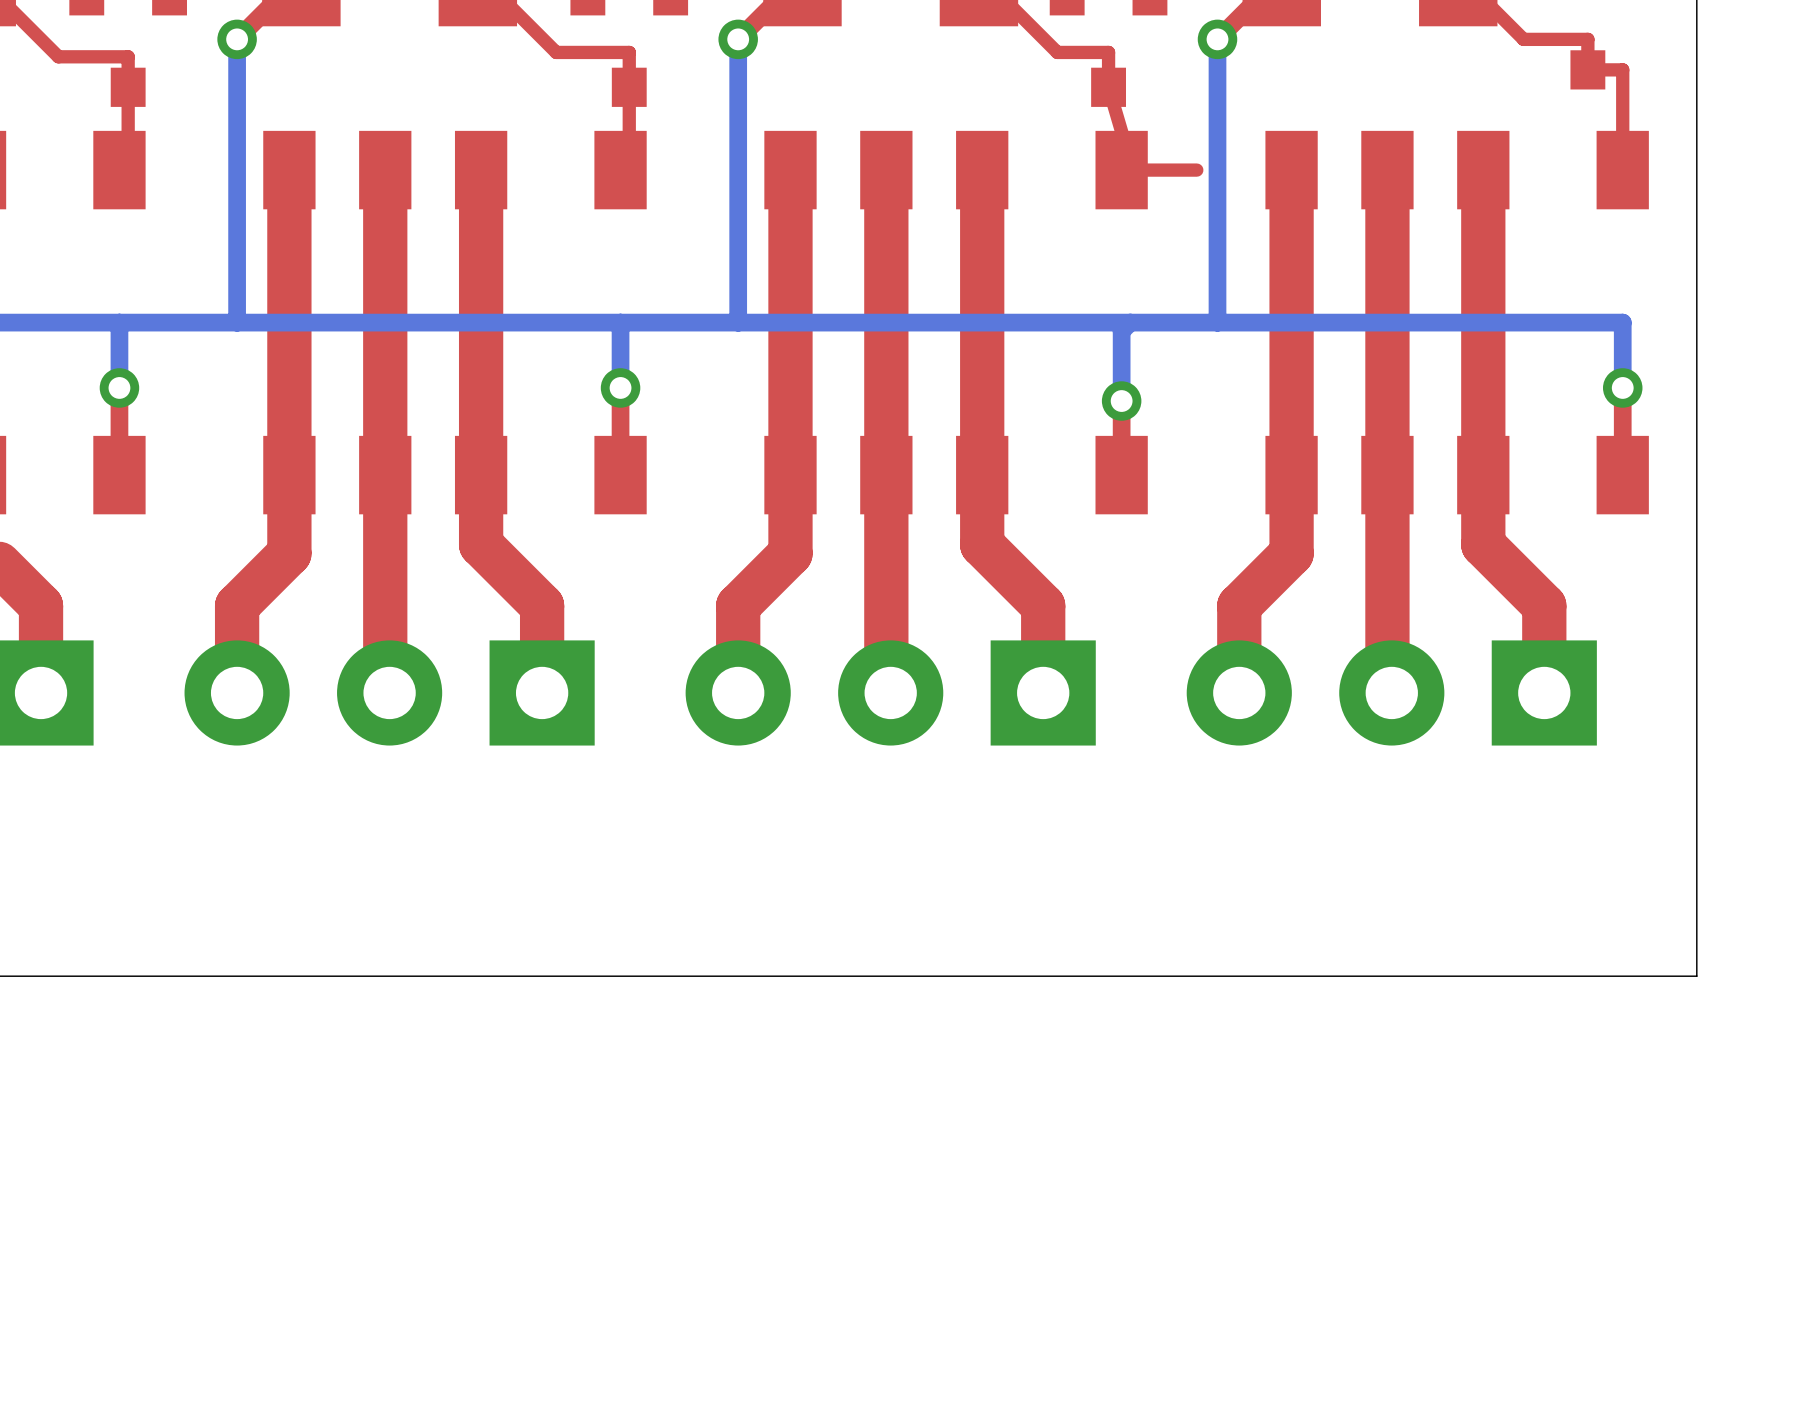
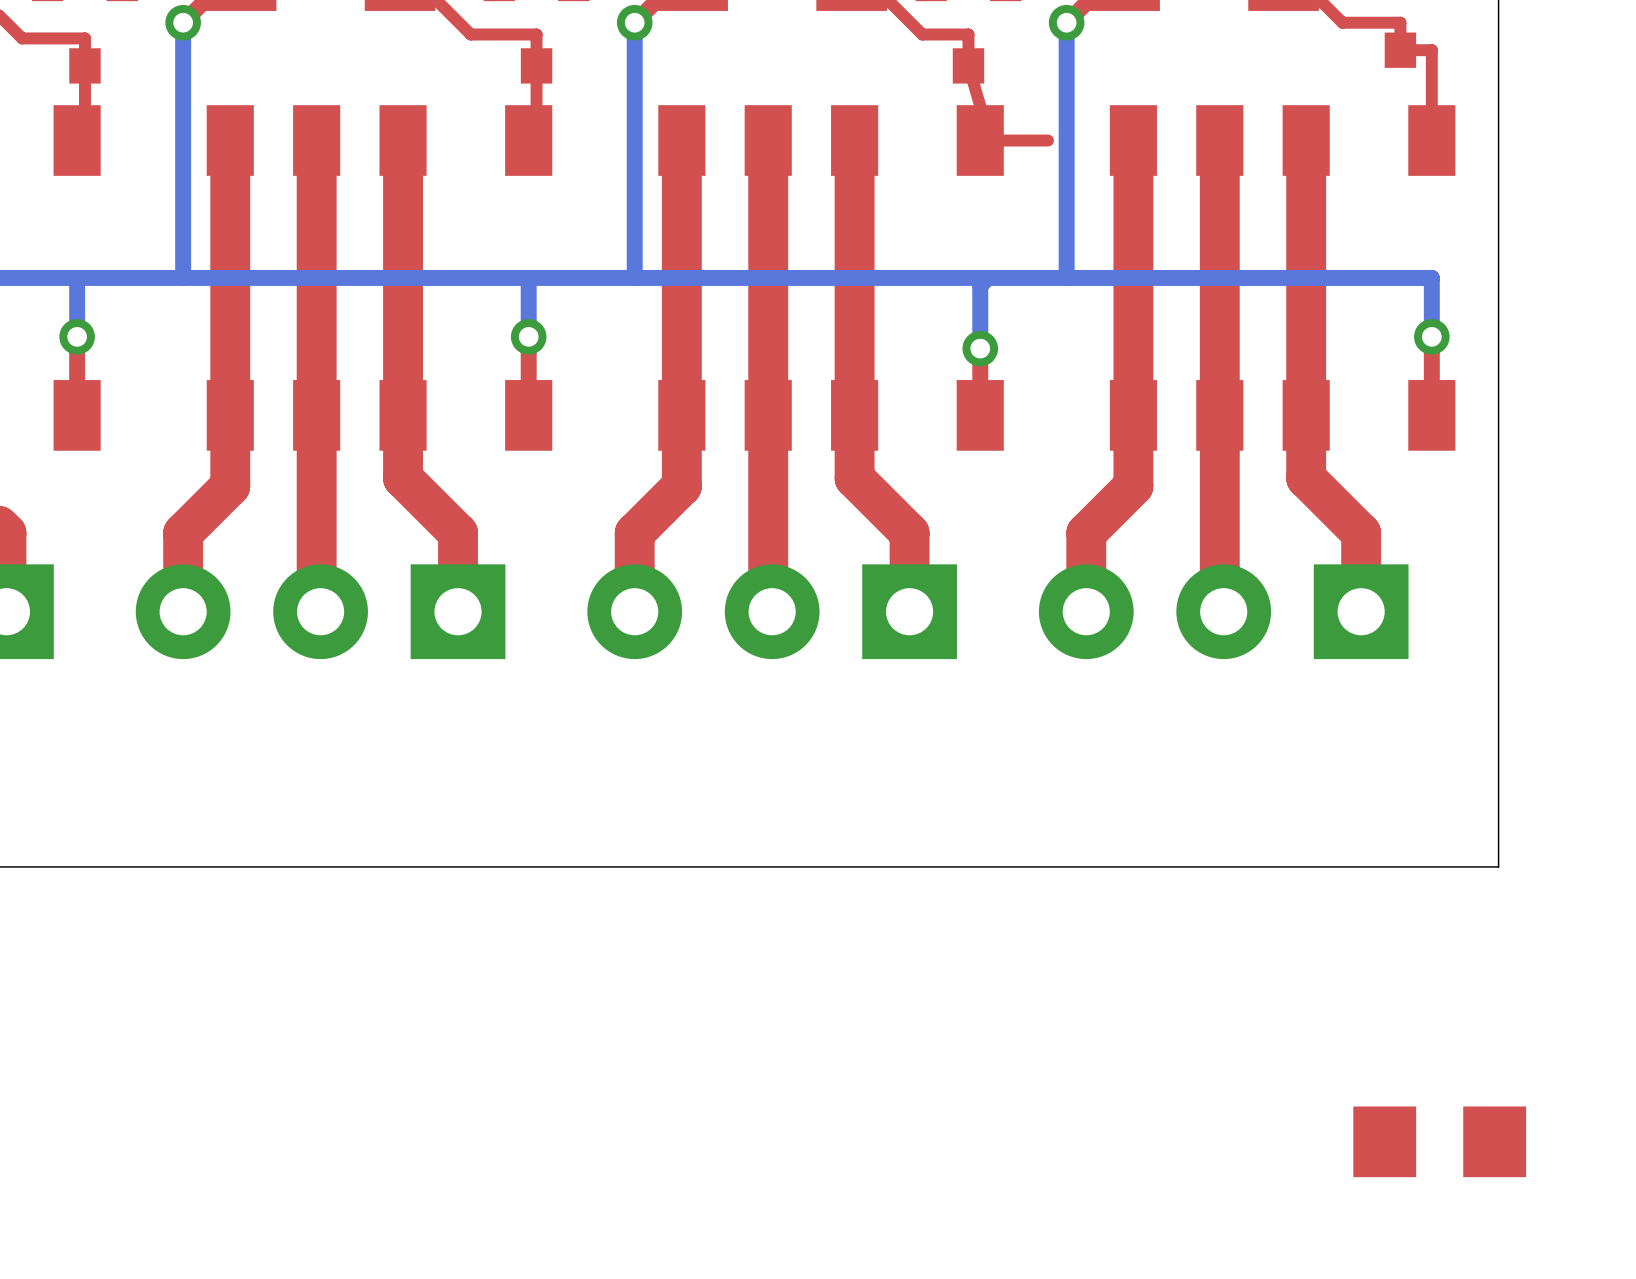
part: none -> (1439, 1141)

